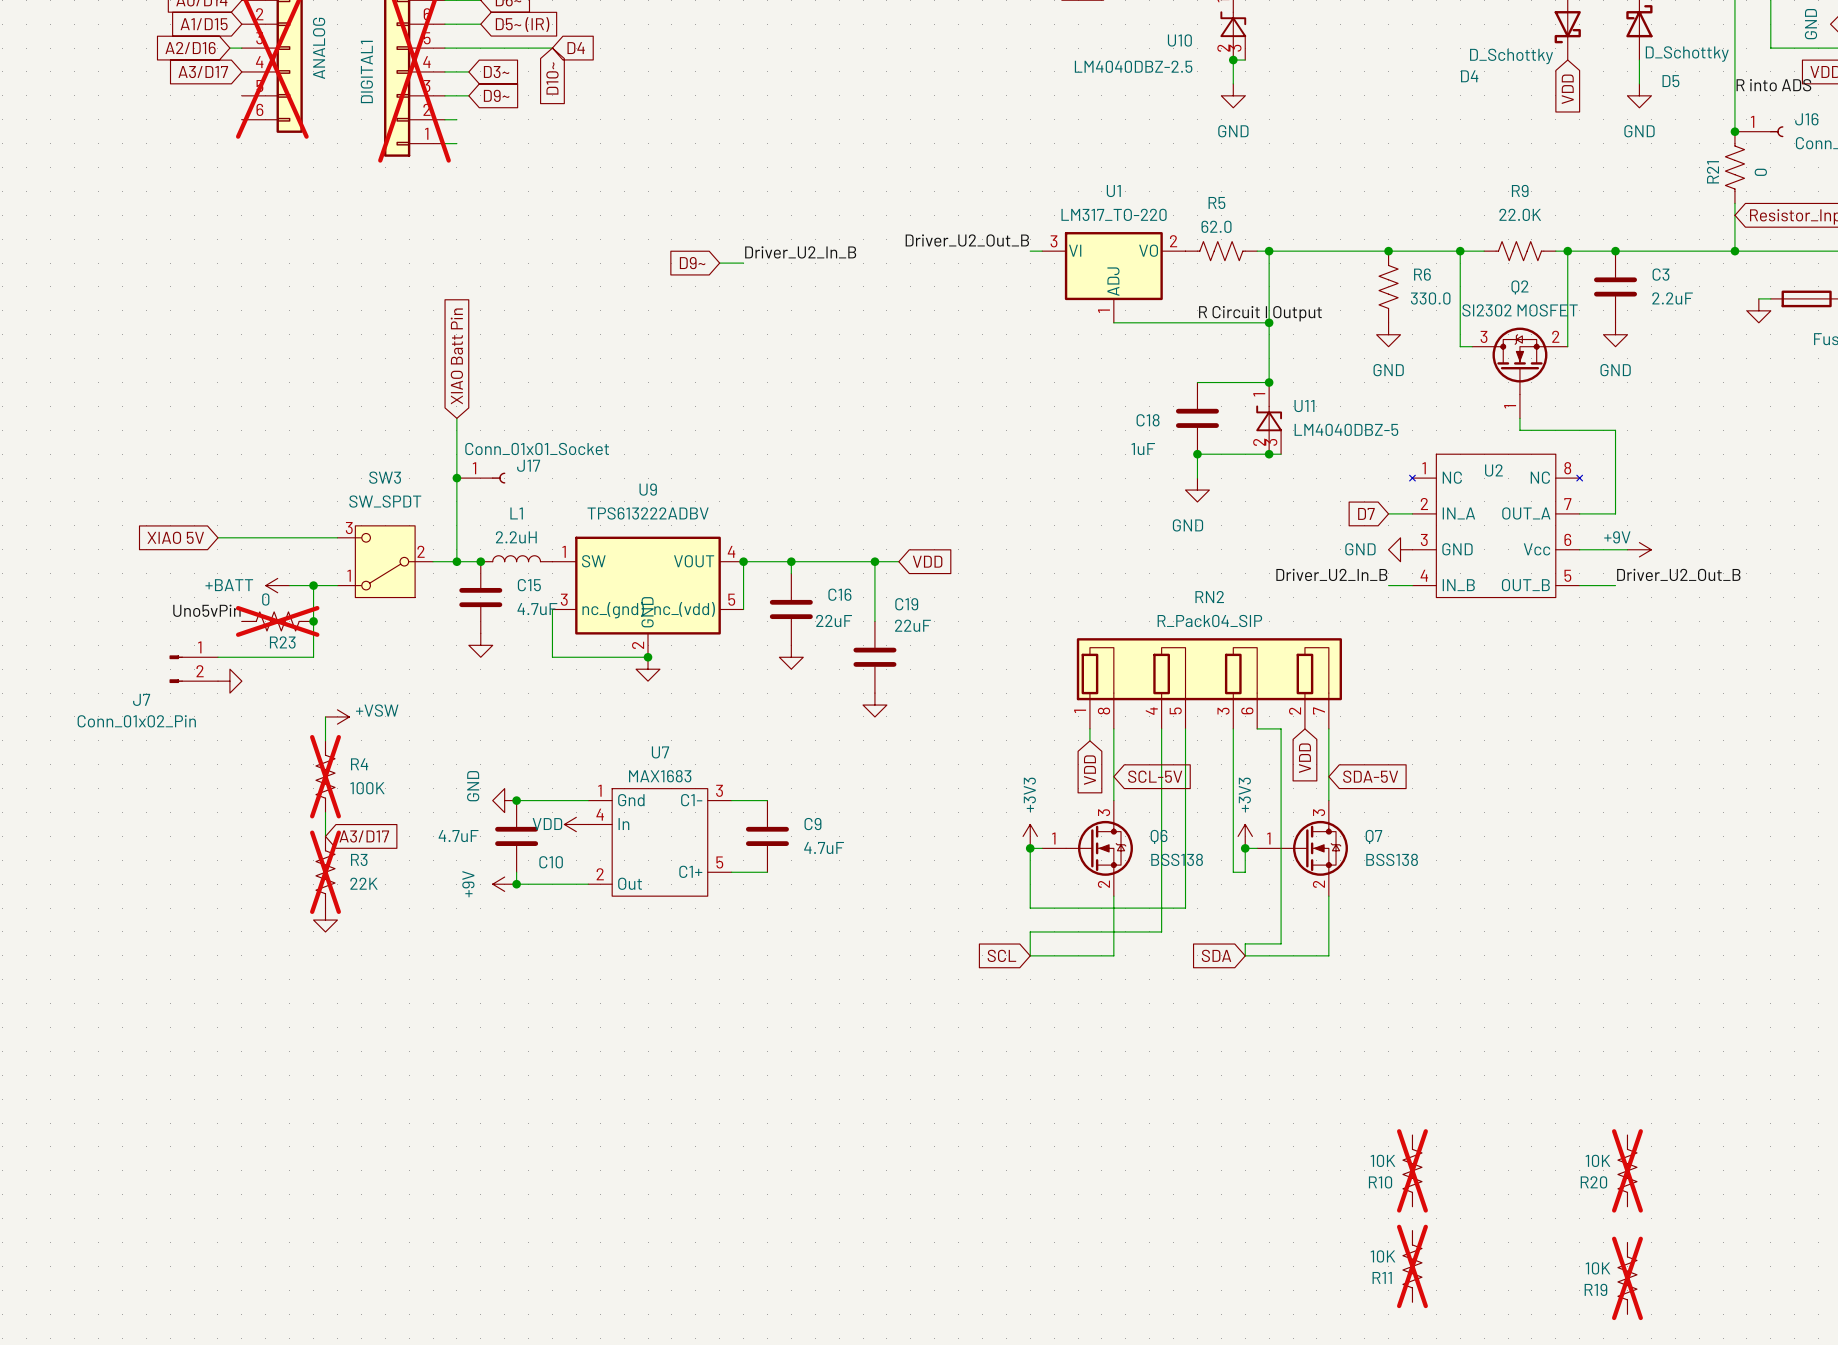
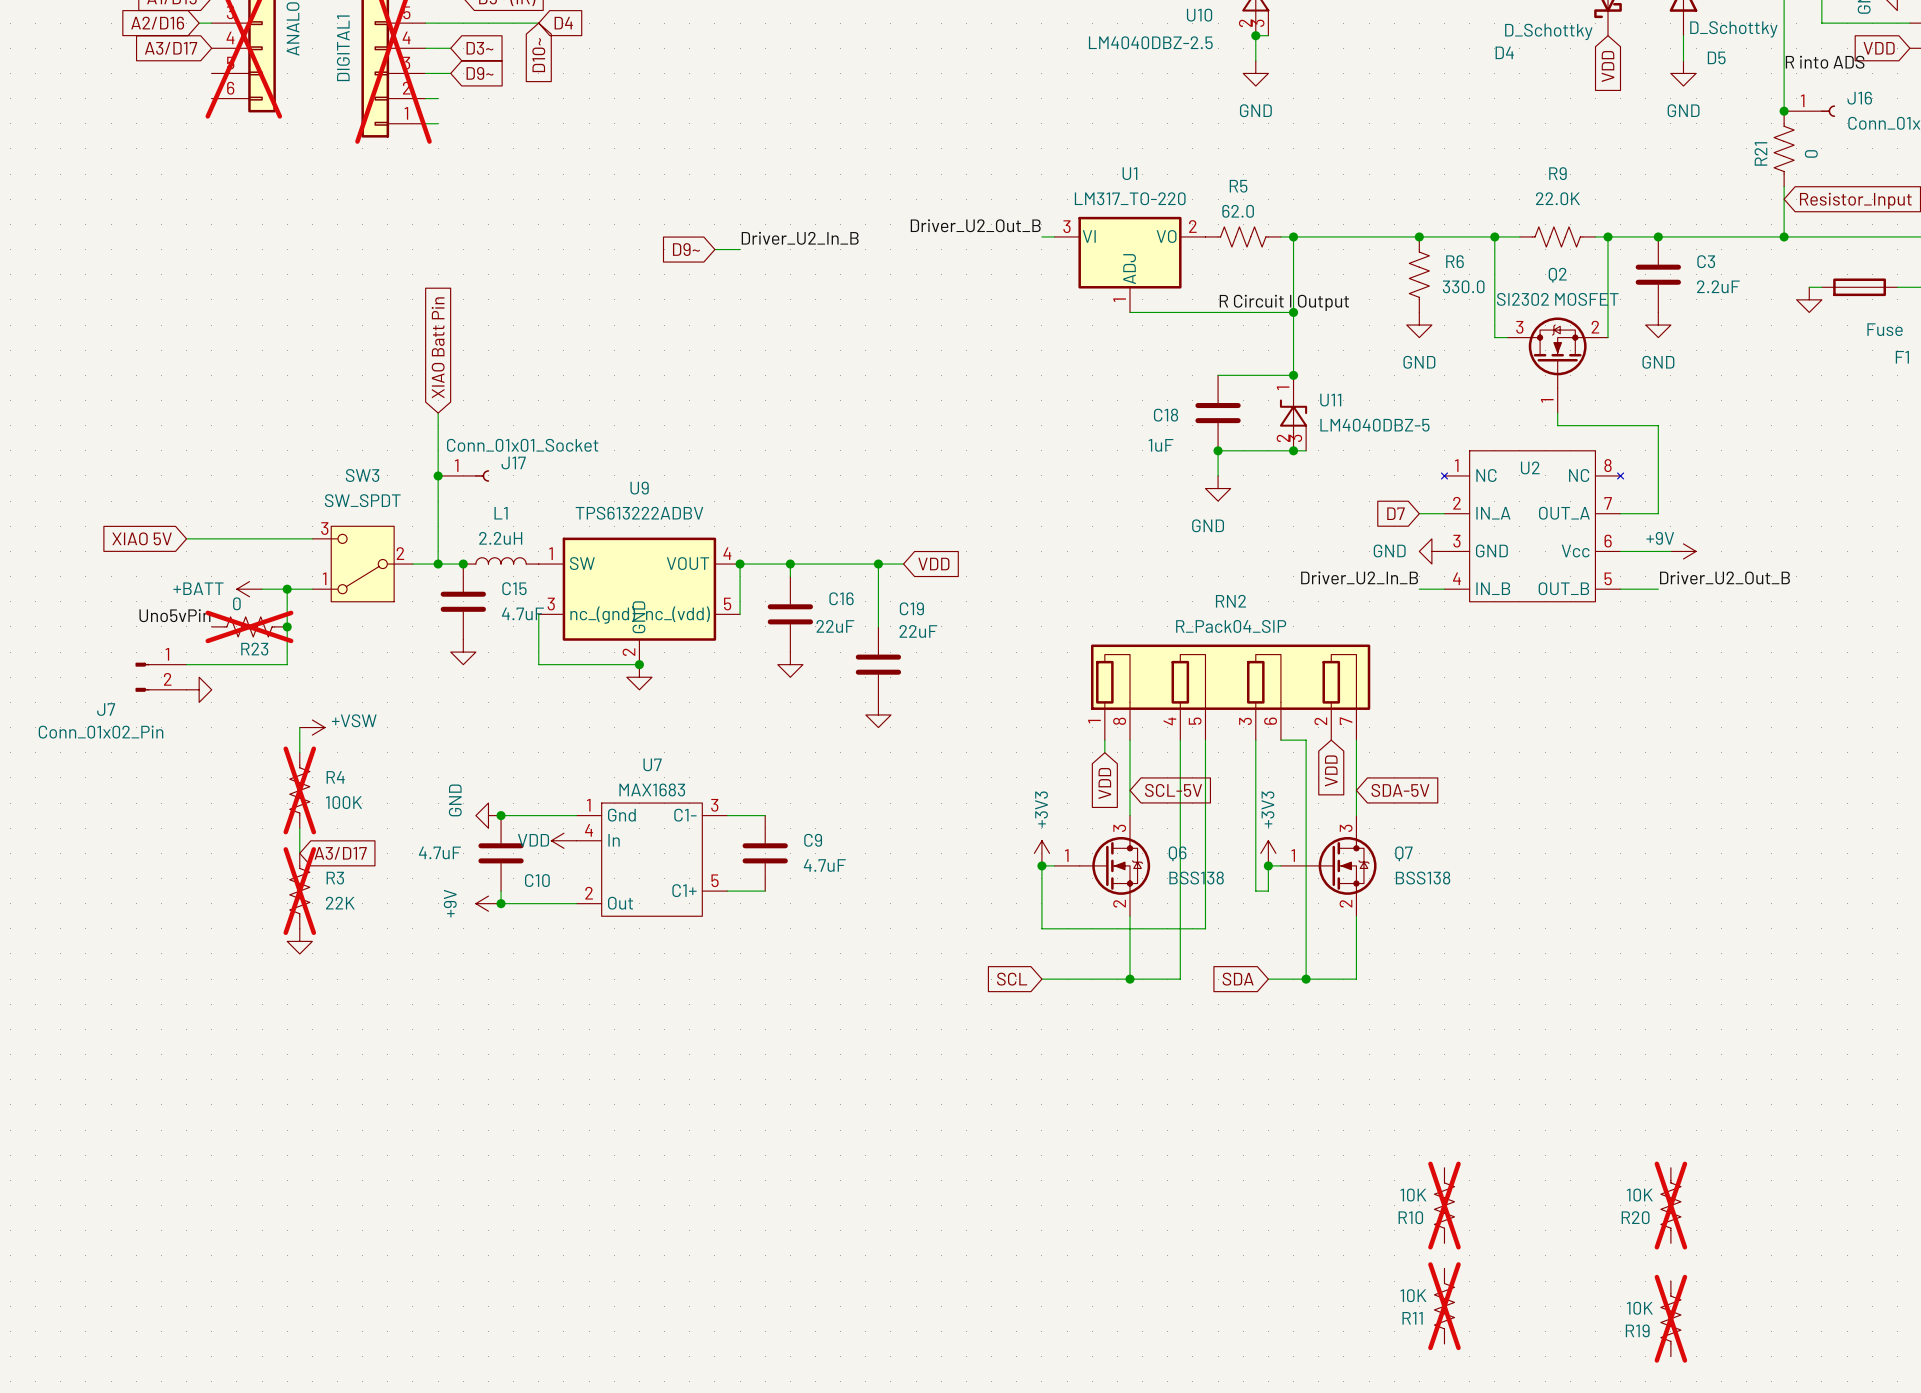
wire: (1161, 931) (1030, 931) (1030, 955) -> (1180, 953) (1180, 979) (1130, 979)
wire: (1281, 943) (1245, 943) (1245, 955) -> (1306, 966) (1306, 979)
junction: none -> (1130, 979)
junction: none -> (1306, 979)

